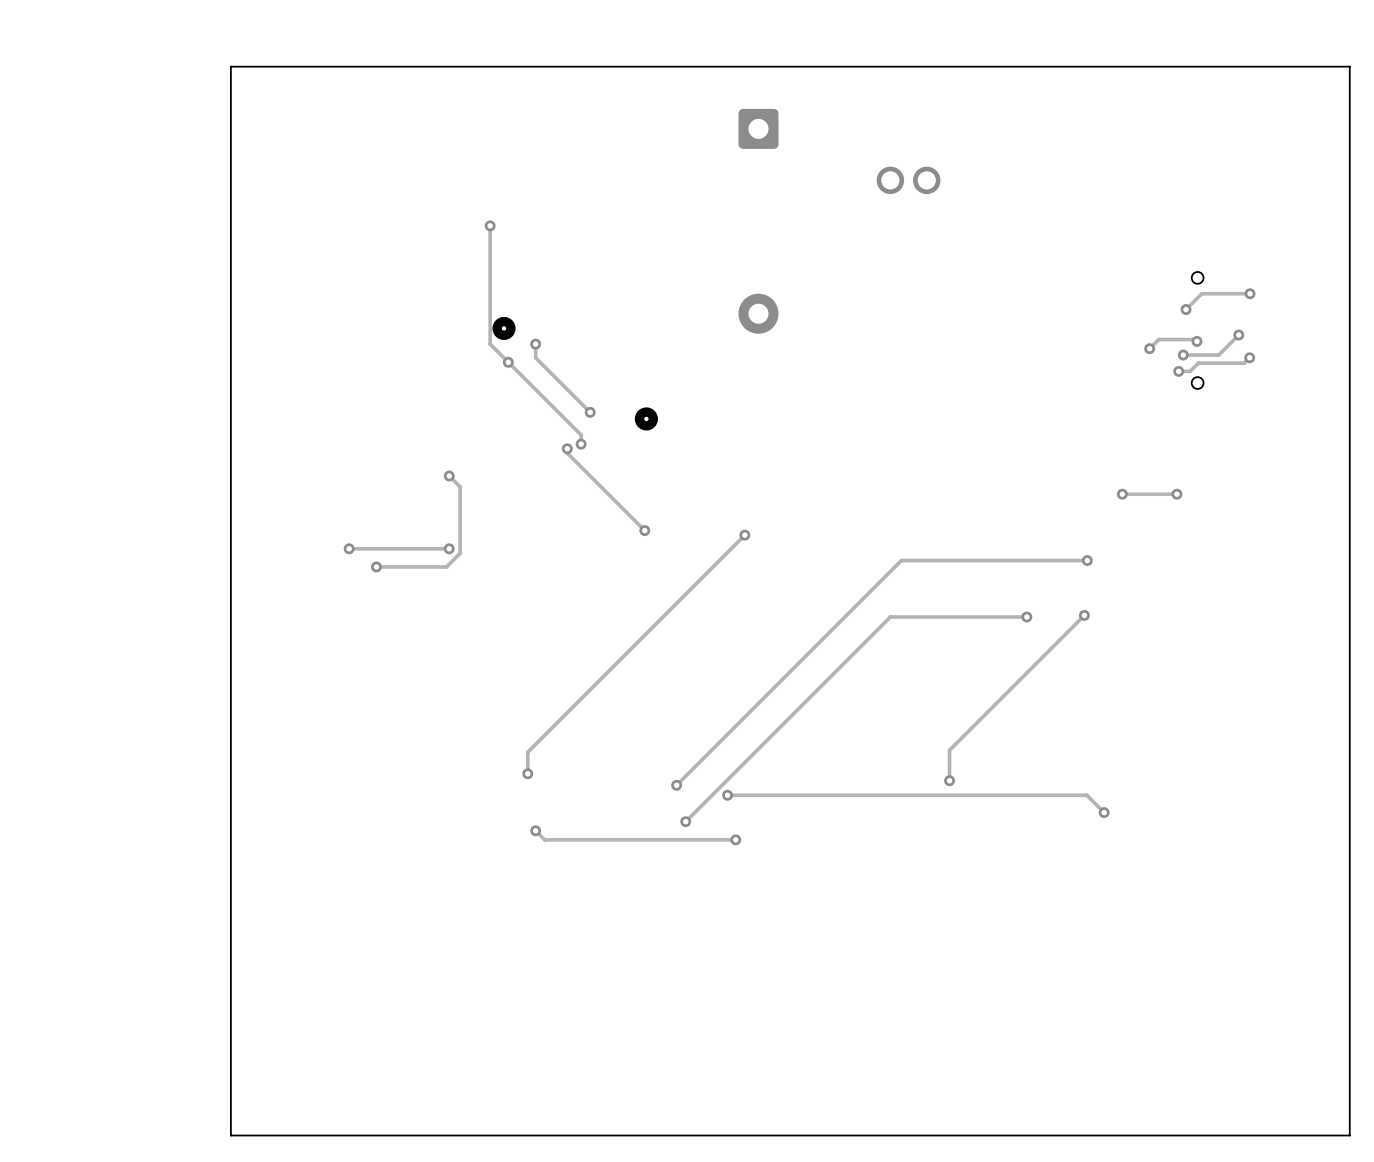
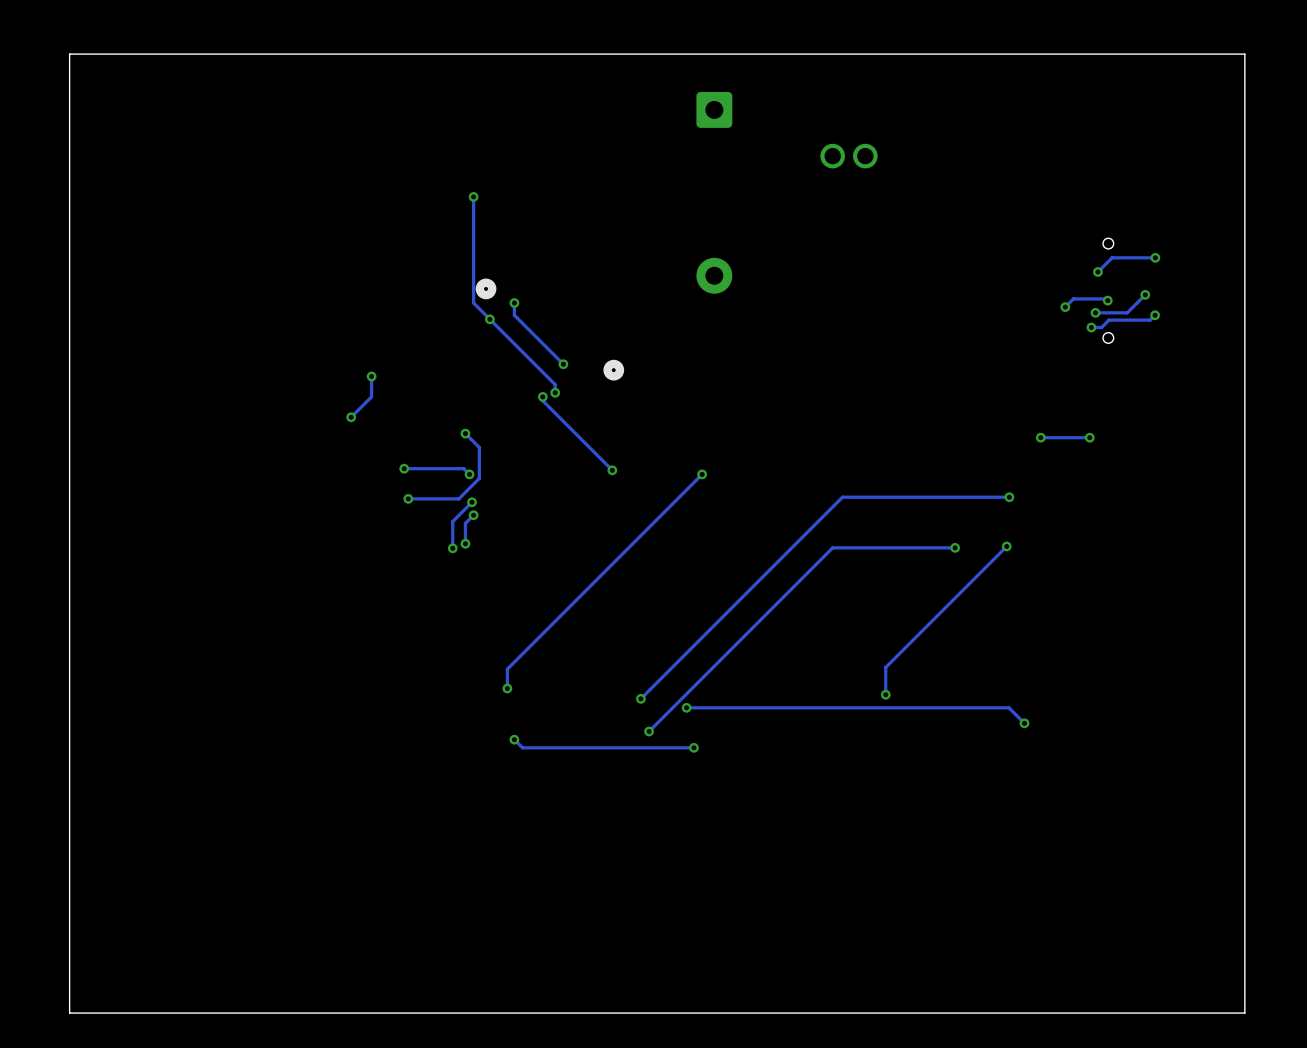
board edge: (230, 66) (230, 1135) -> (241, 54) (69, 54) (69, 1013) (241, 1013)
track: none -> (371, 376) (371, 396) (351, 417)
via: none -> (371, 376)
via: none -> (351, 417)
track: (449, 476) (460, 486) (460, 553) (446, 566) (376, 566) -> none
via: (449, 476) -> none
track: none -> (465, 433) (479, 447) (479, 478) (458, 498) (408, 498)
via: none -> (465, 433)
track: none -> (404, 468) (463, 468) (469, 474)
via: none -> (404, 468)
via: none -> (469, 474)
via: (349, 548) -> none
track: (449, 548) (349, 548) -> none
via: (449, 548) -> none
via: none -> (408, 498)
via: (376, 566) -> none
track: none -> (472, 502) (452, 521) (452, 548)
via: none -> (472, 502)
track: none -> (473, 515) (465, 523) (465, 543)
via: none -> (473, 515)
via: none -> (465, 543)
via: none -> (452, 548)

